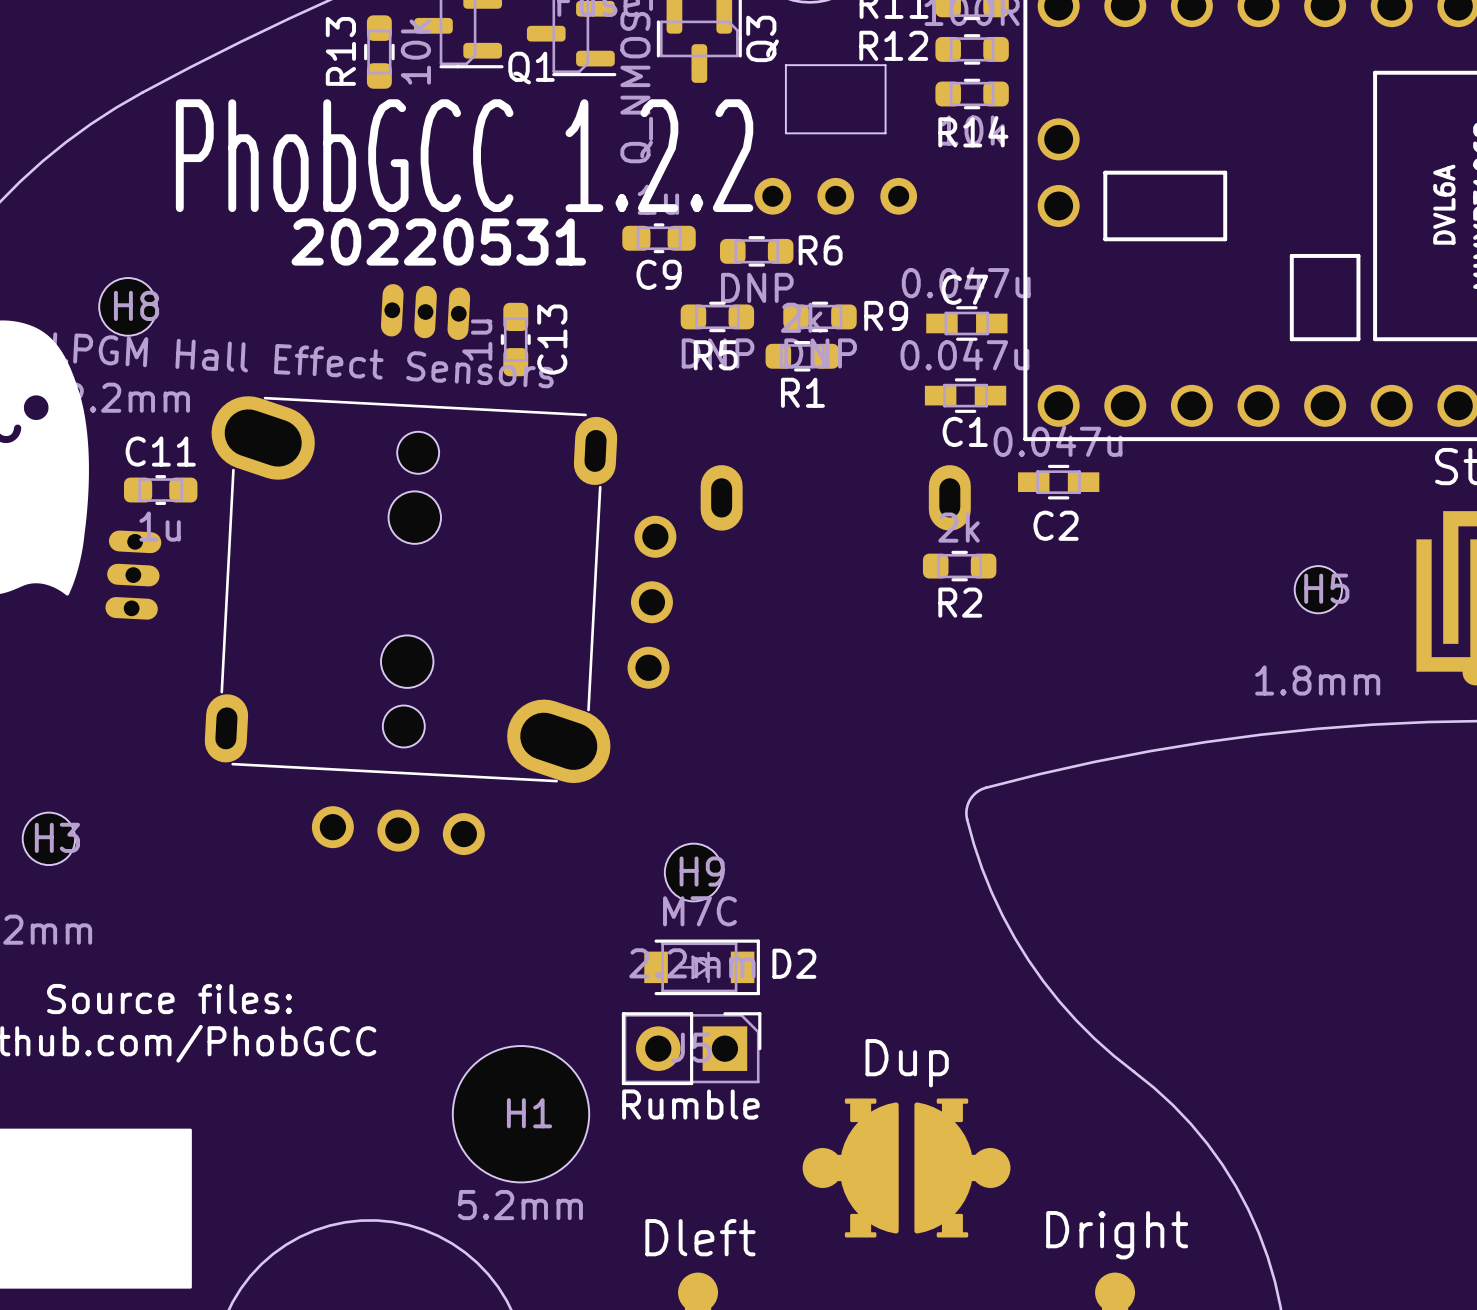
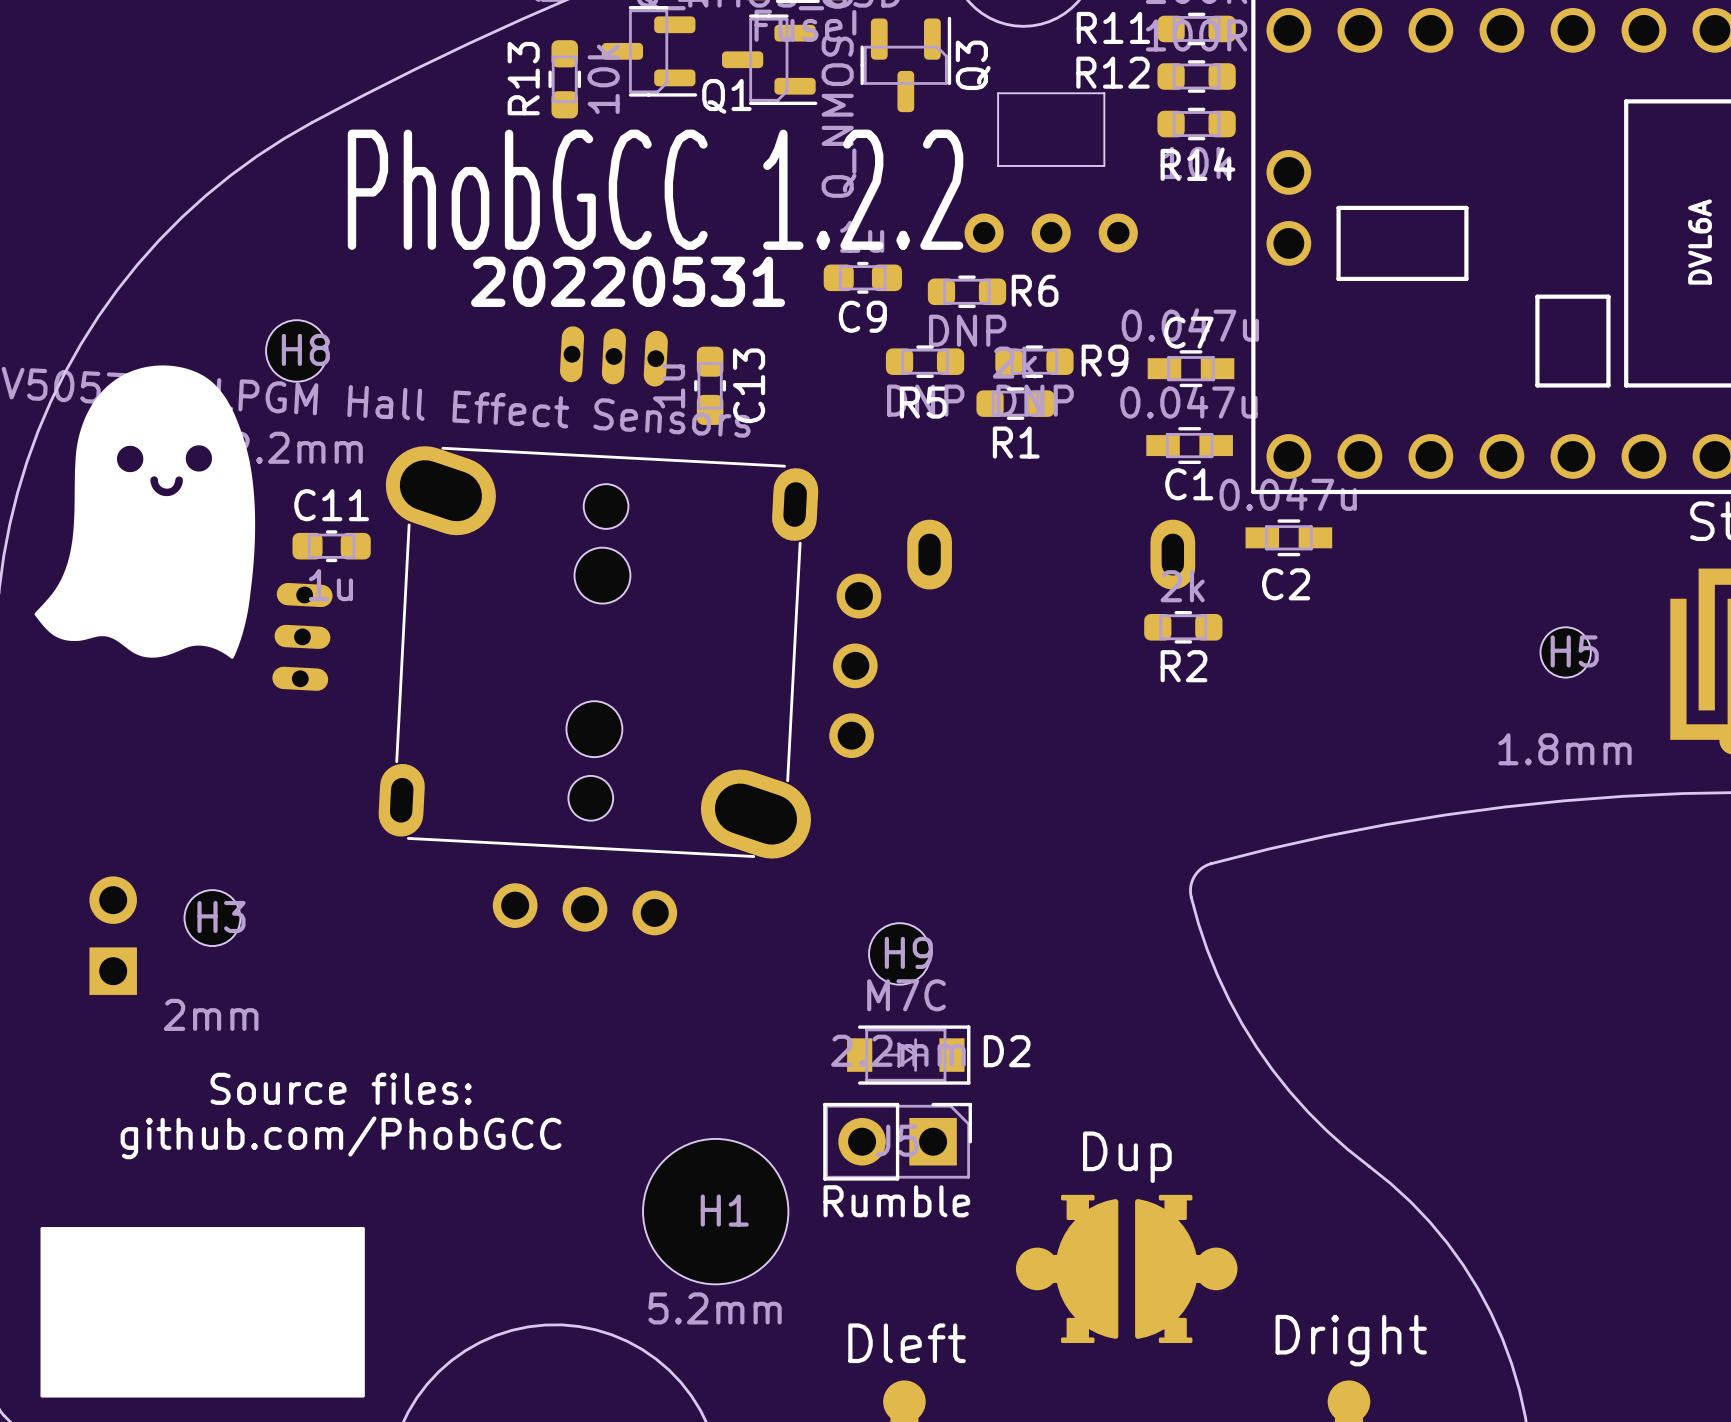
part footprint: [105, 284, 677, 856] -> [272, 326, 882, 936]

